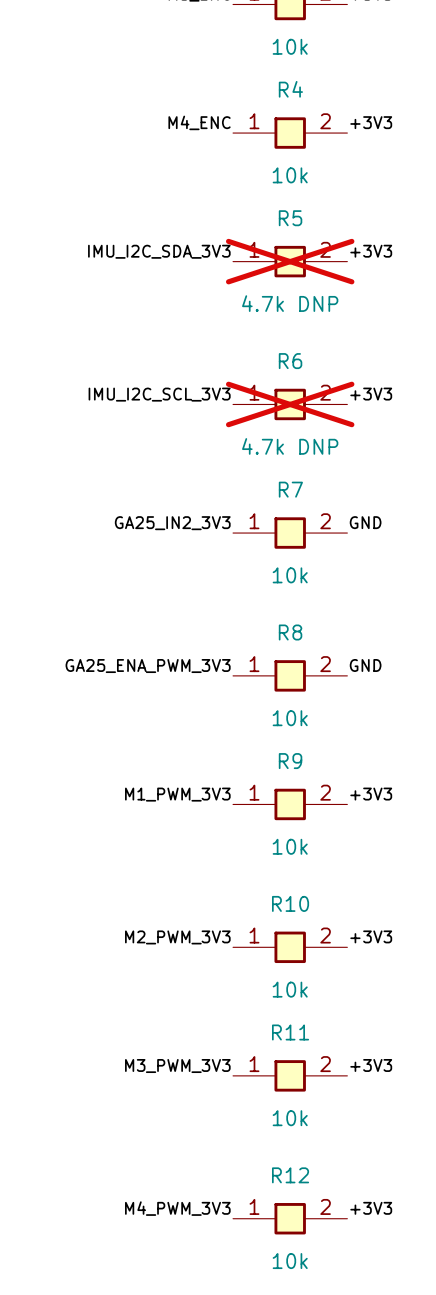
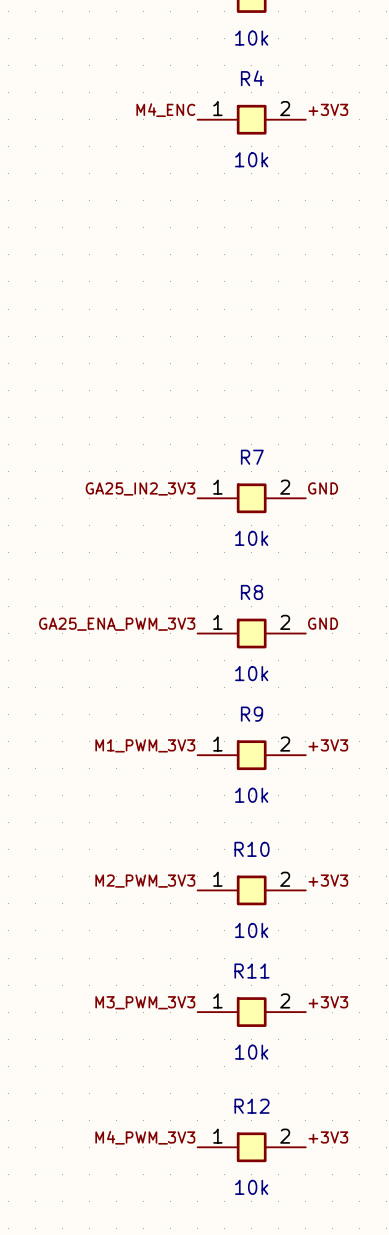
label: IMU_I2C_SDA_3V3 (159, 251) -> none
label: +3V3 (371, 251) -> none
R5: 4.7k DNP (290, 261) -> none
label: IMU_I2C_SCL_3V3 (159, 394) -> none
label: +3V3 (371, 394) -> none
R6: 4.7k DNP (290, 404) -> none

